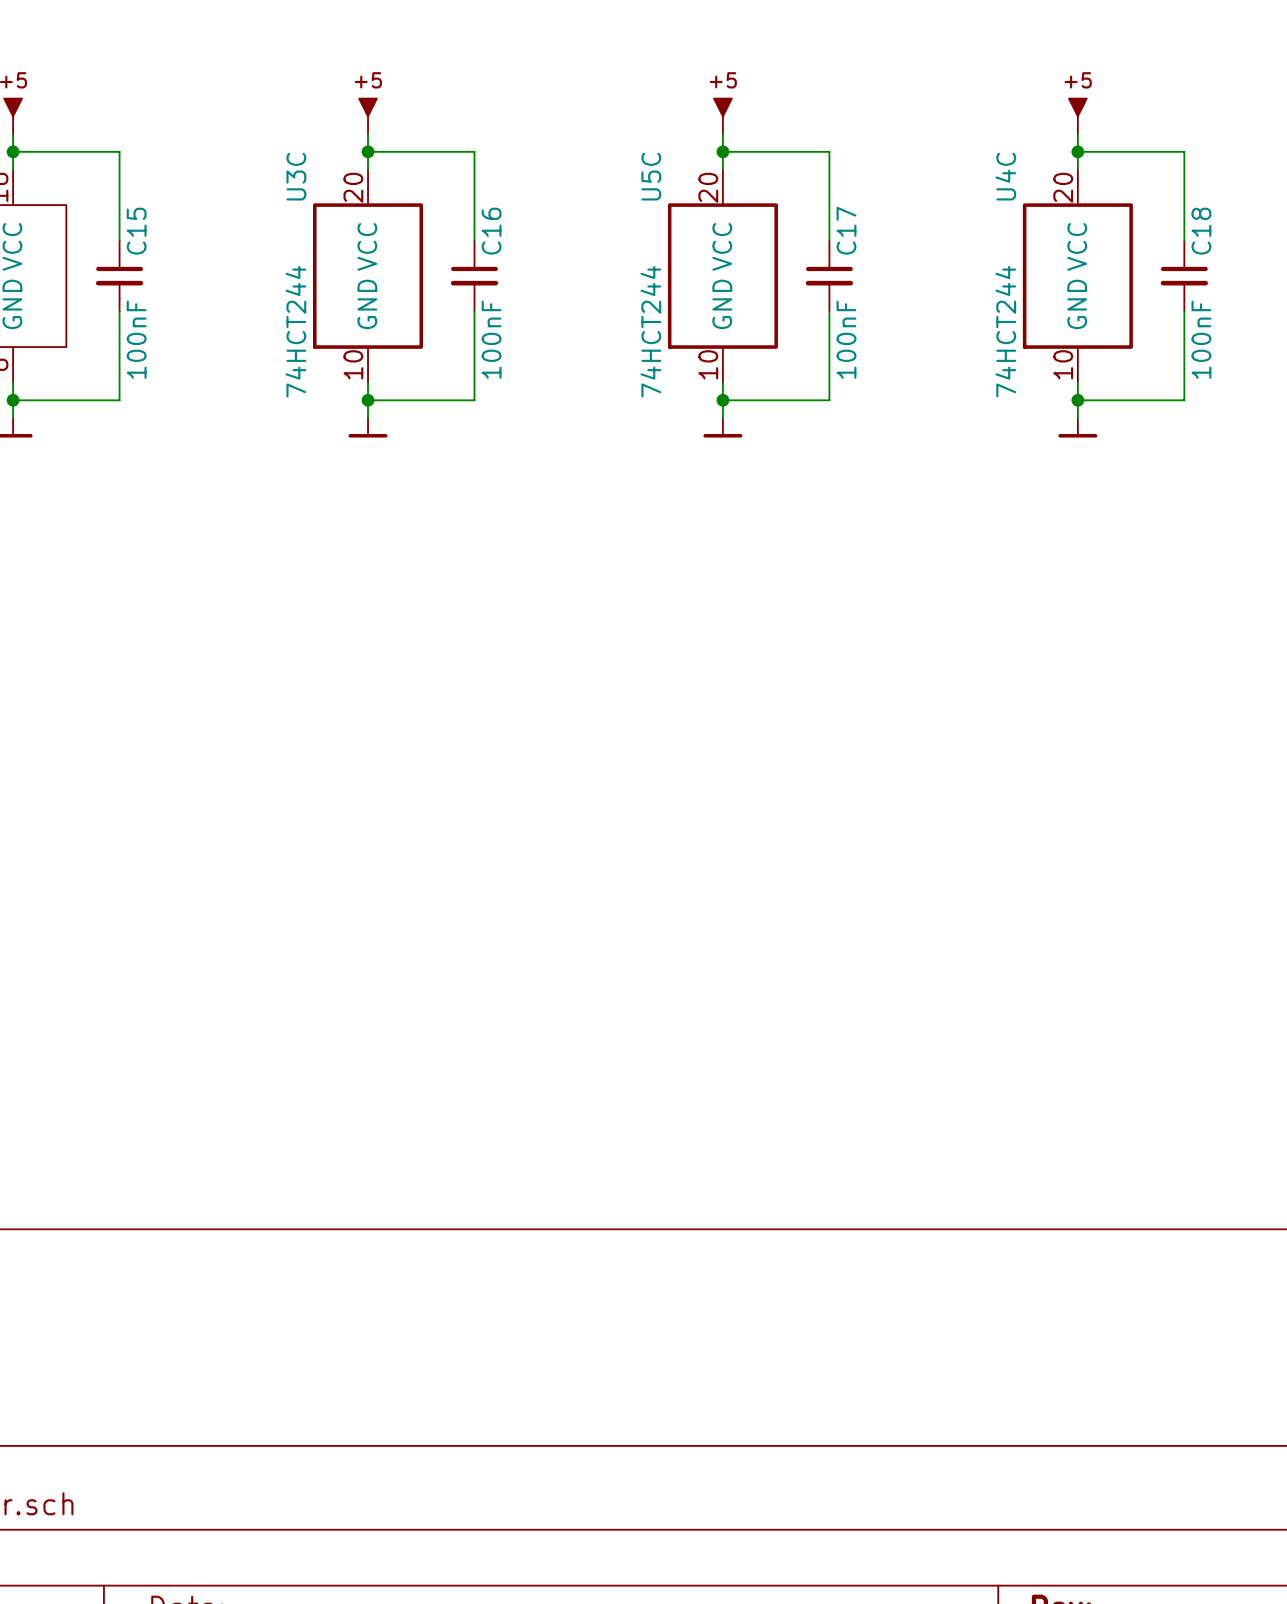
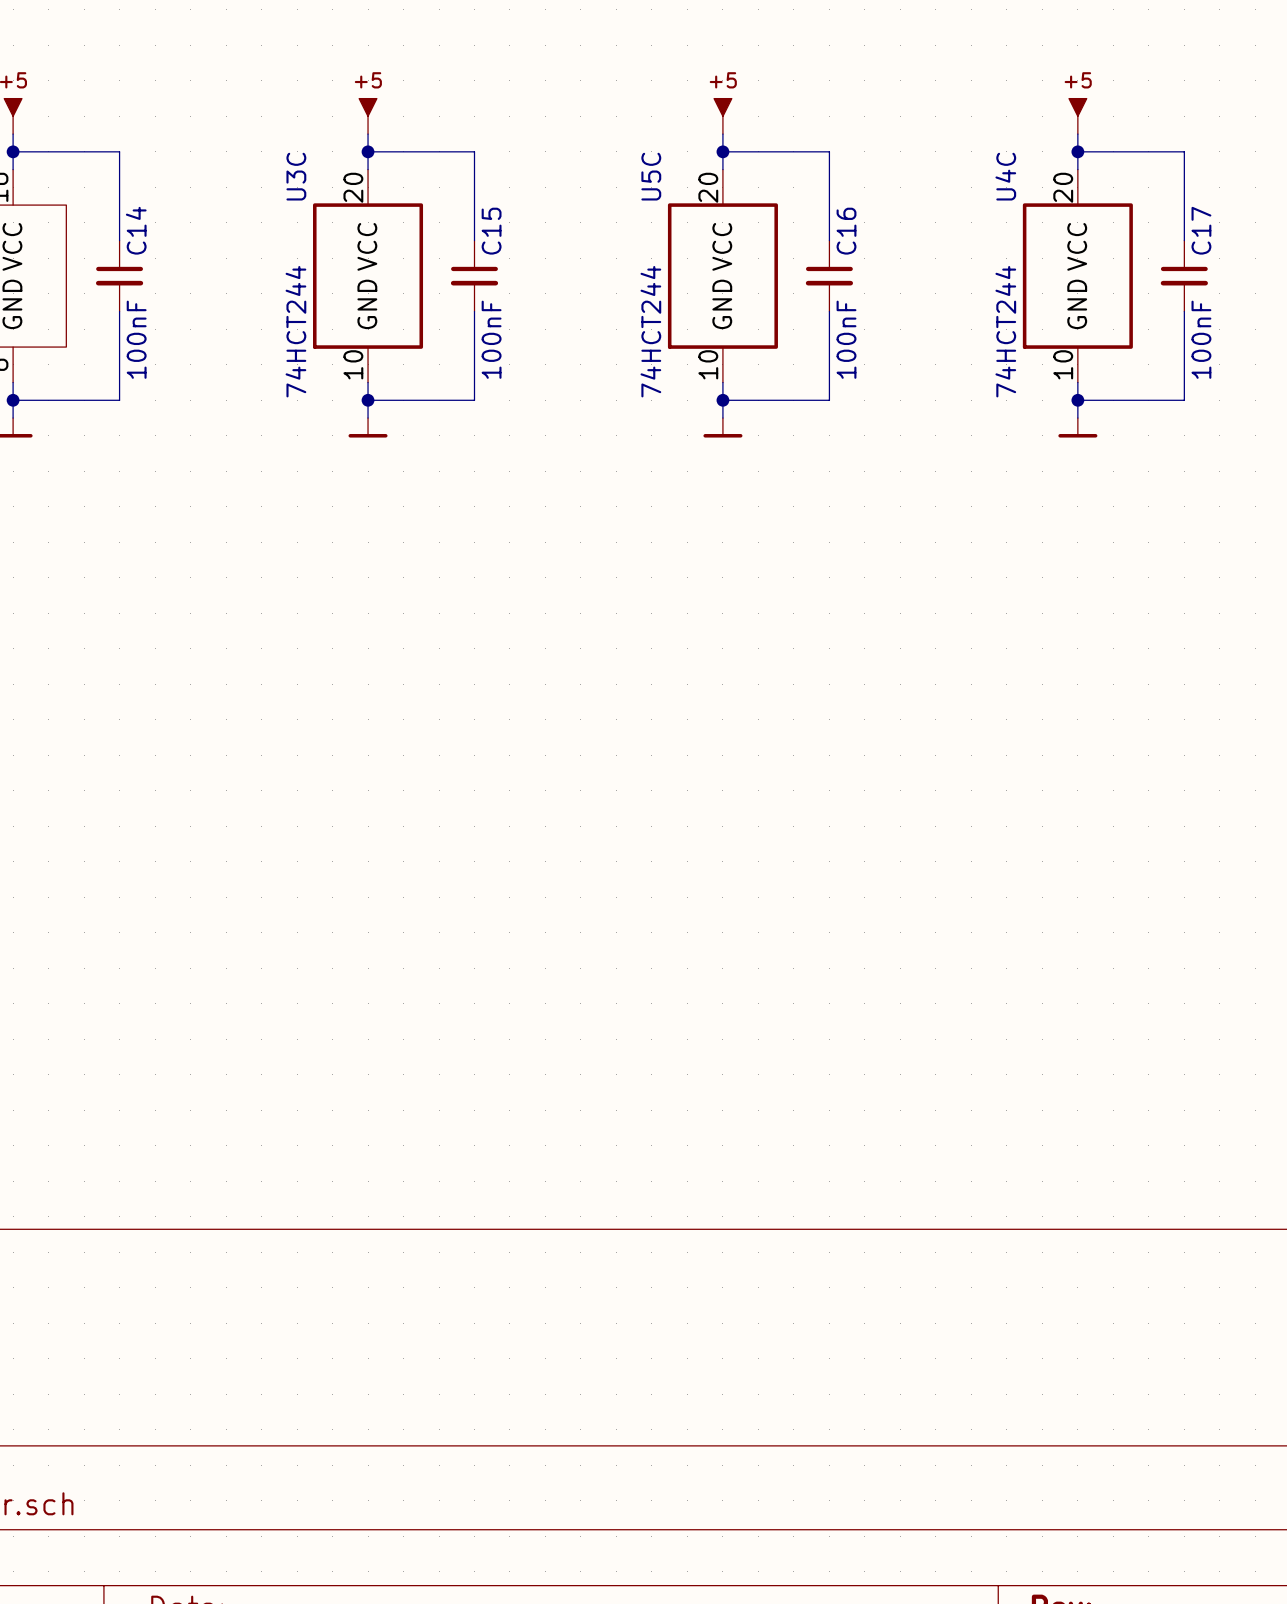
C17 name: C17 (846, 230) -> C16 (846, 231)
C15 name: C15 (136, 231) -> C14 (136, 230)
C16 name: C16 (491, 231) -> C15 (491, 231)
C18 name: C18 (1201, 231) -> C17 (1201, 230)

